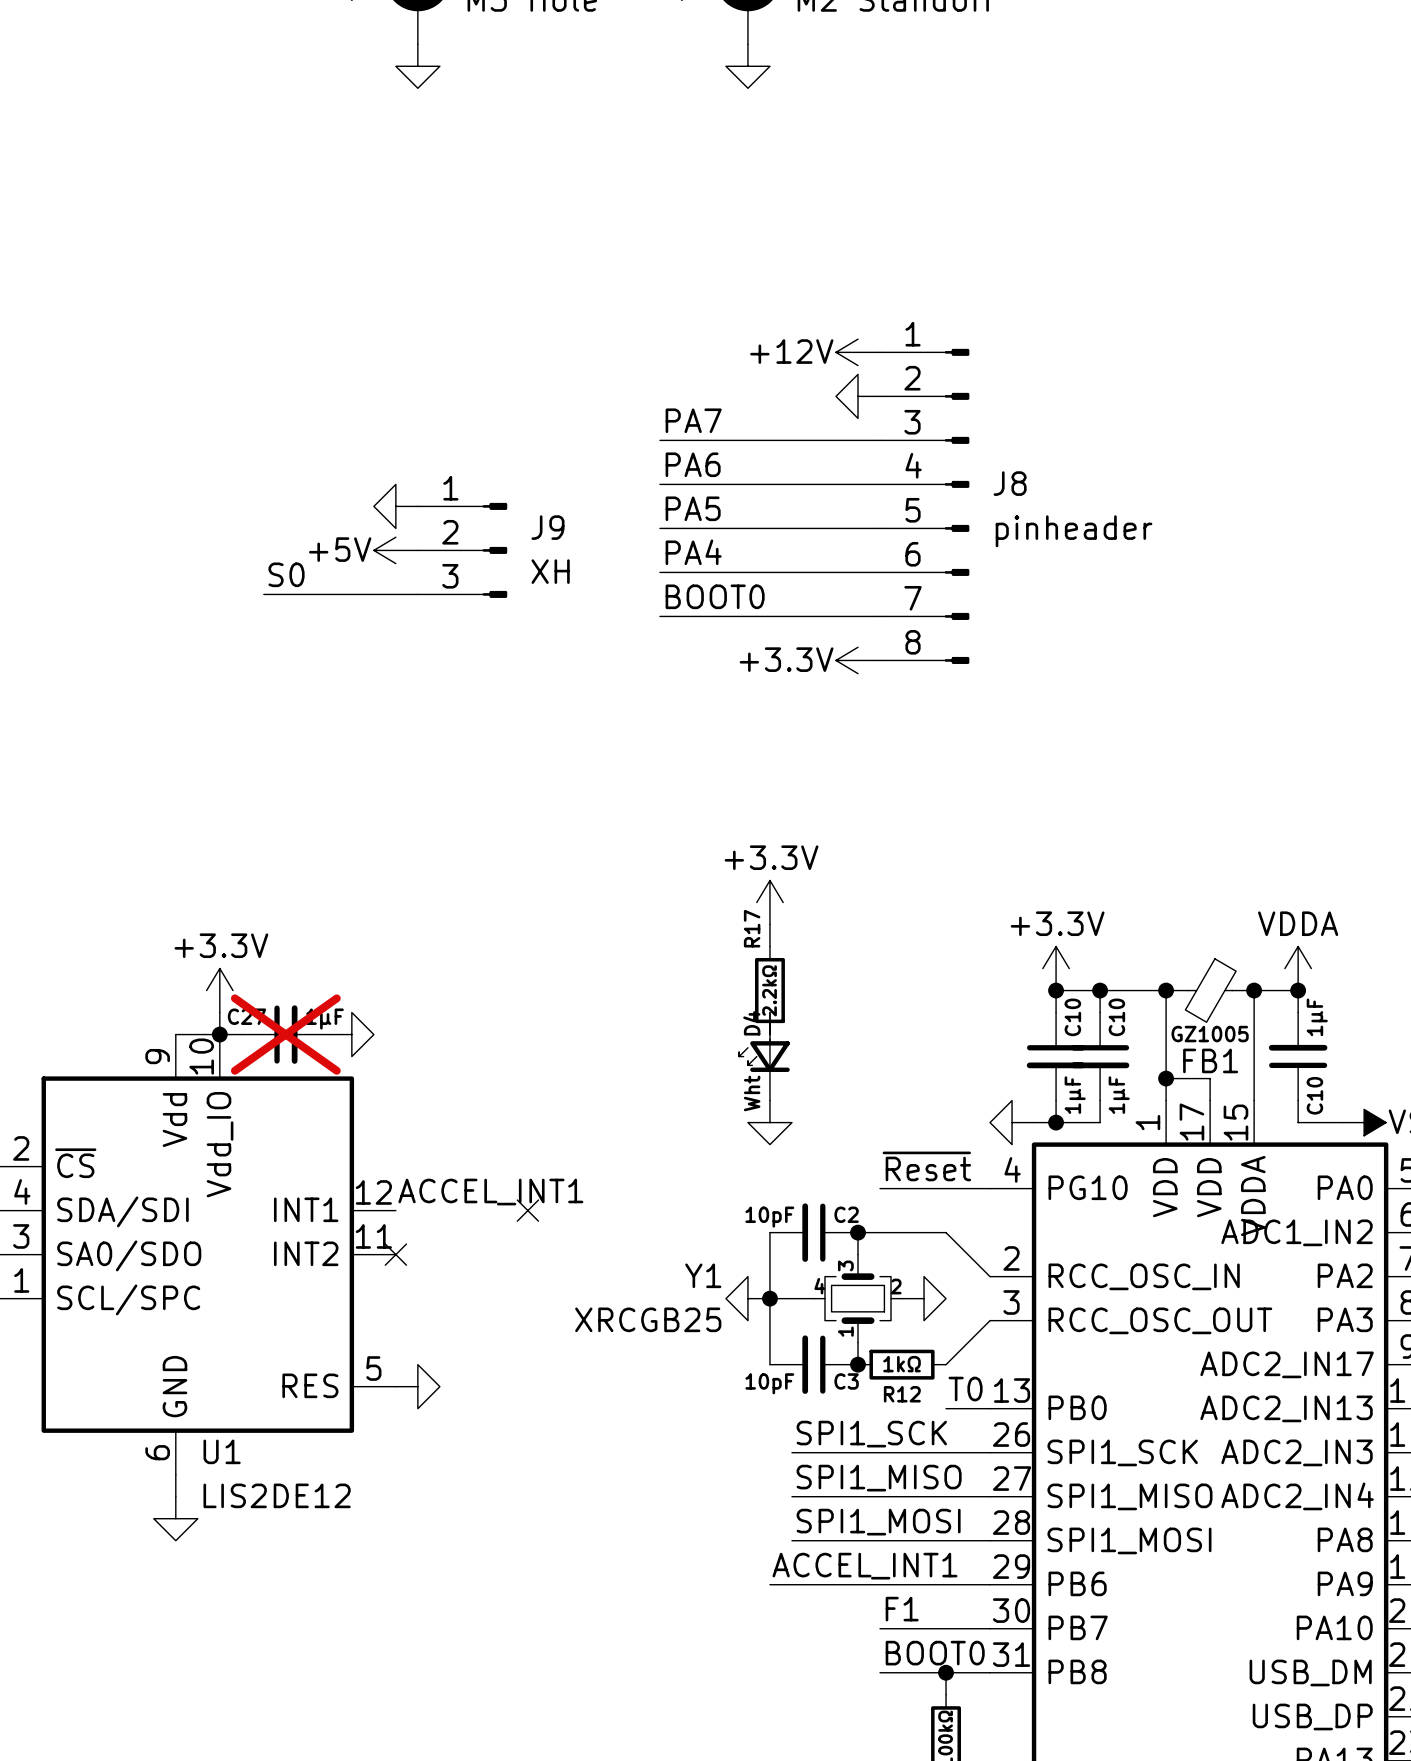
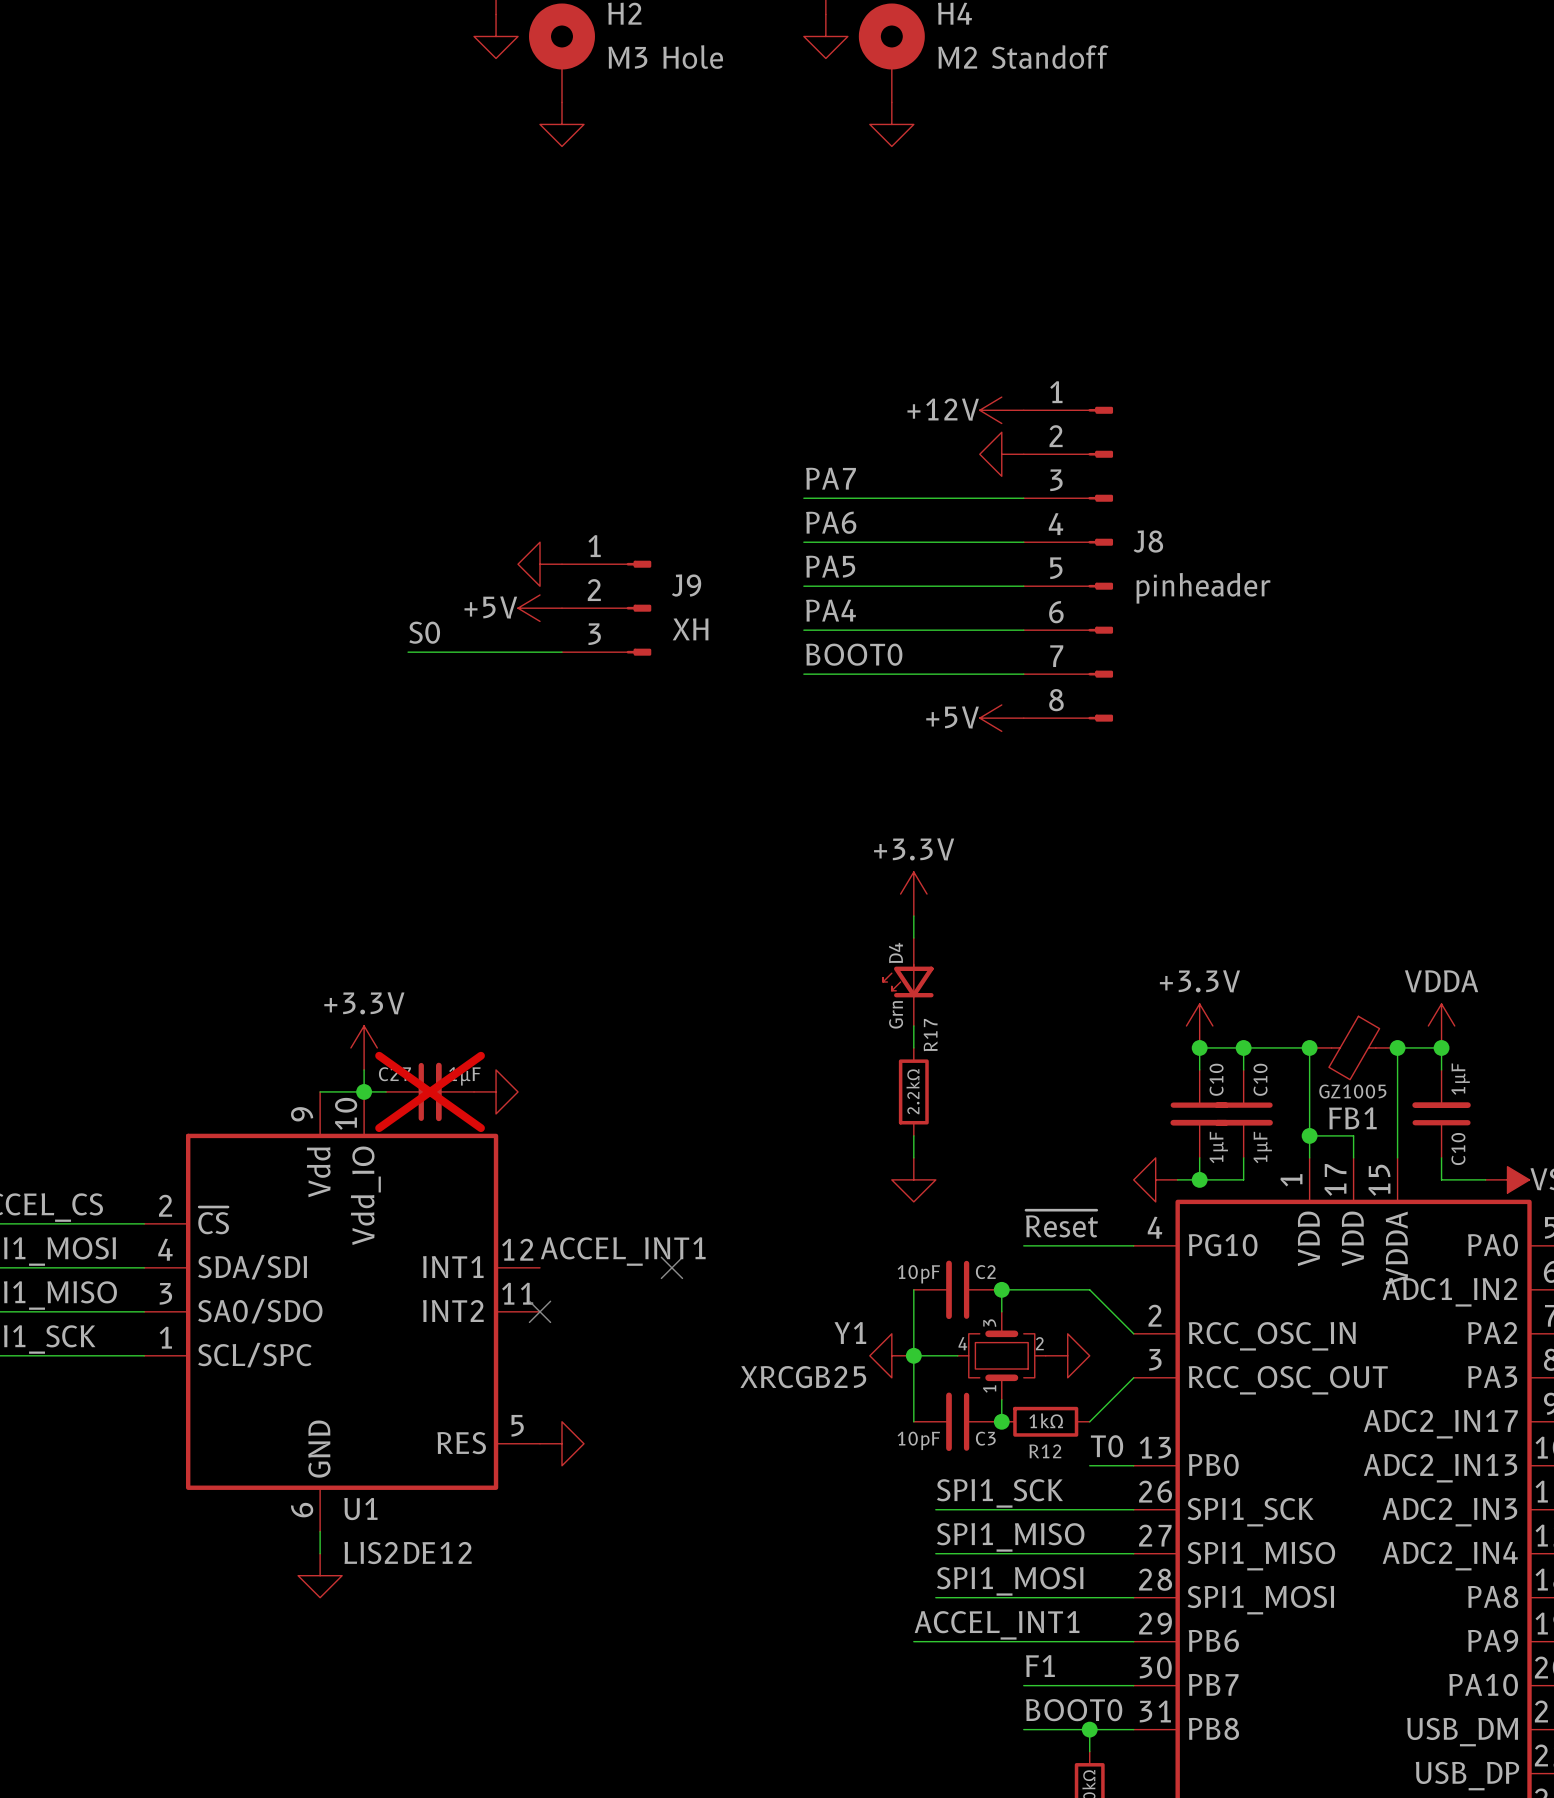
power symbol: +3.3V (858, 660) -> +5V (1001, 718)
wire: none -> (913, 916) (913, 938)
power symbol position: +3.3V (769, 902) -> +3.3V (913, 894)
R17 name position: R17 (752, 928) -> R17 (930, 1035)
R17 position: (769, 990) -> (913, 1091)
D4 position: (764, 1056) -> (908, 982)
D4 value: Wht (752, 1093) -> Grn (896, 1014)

